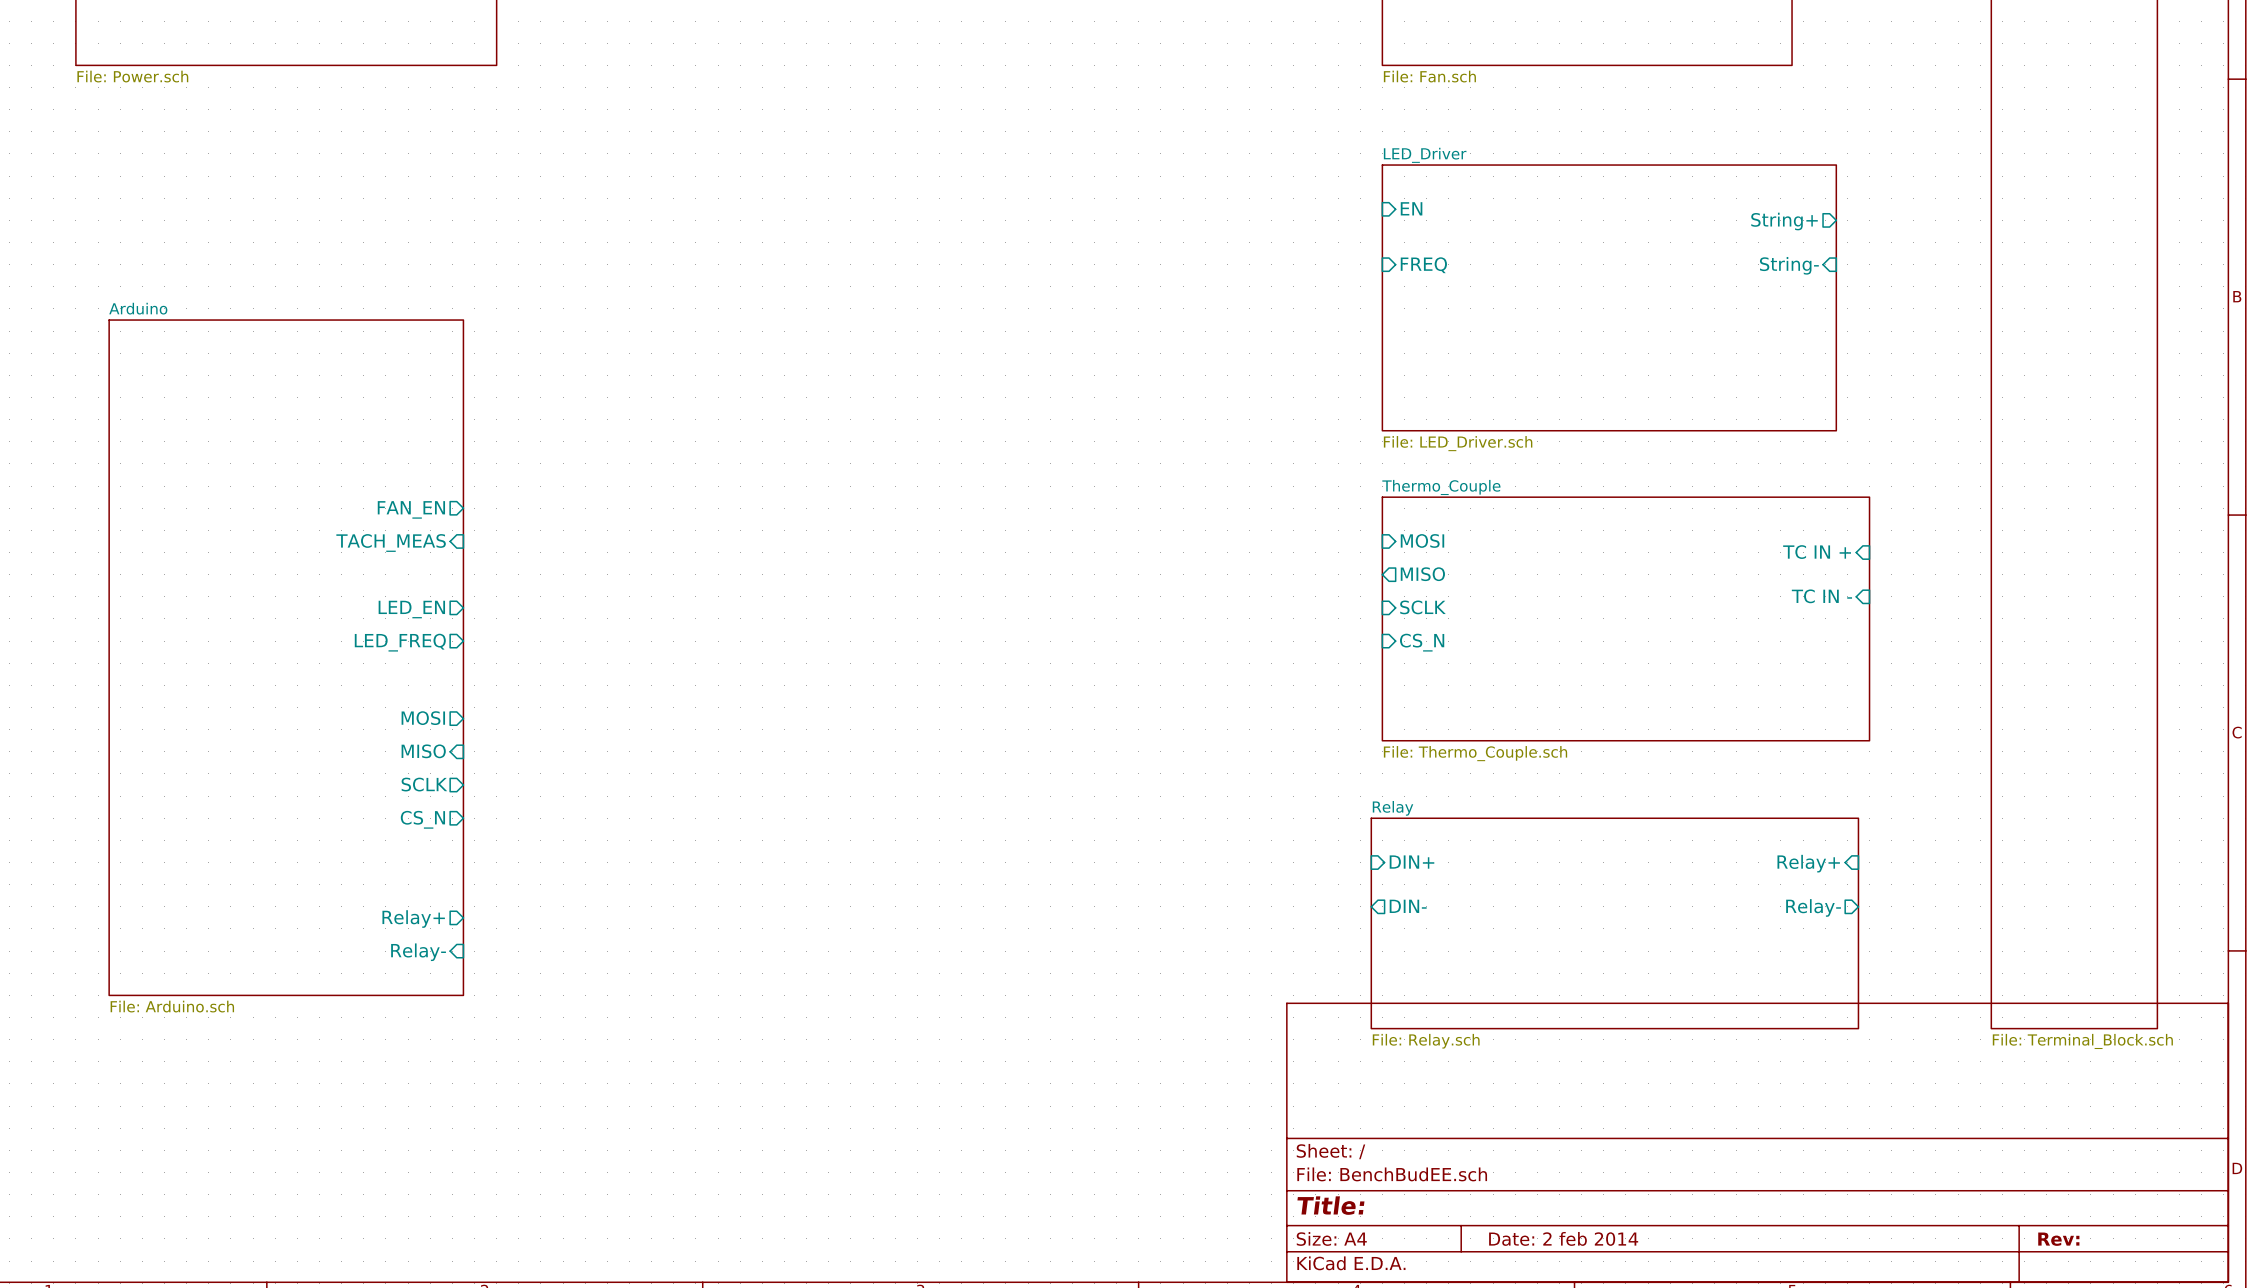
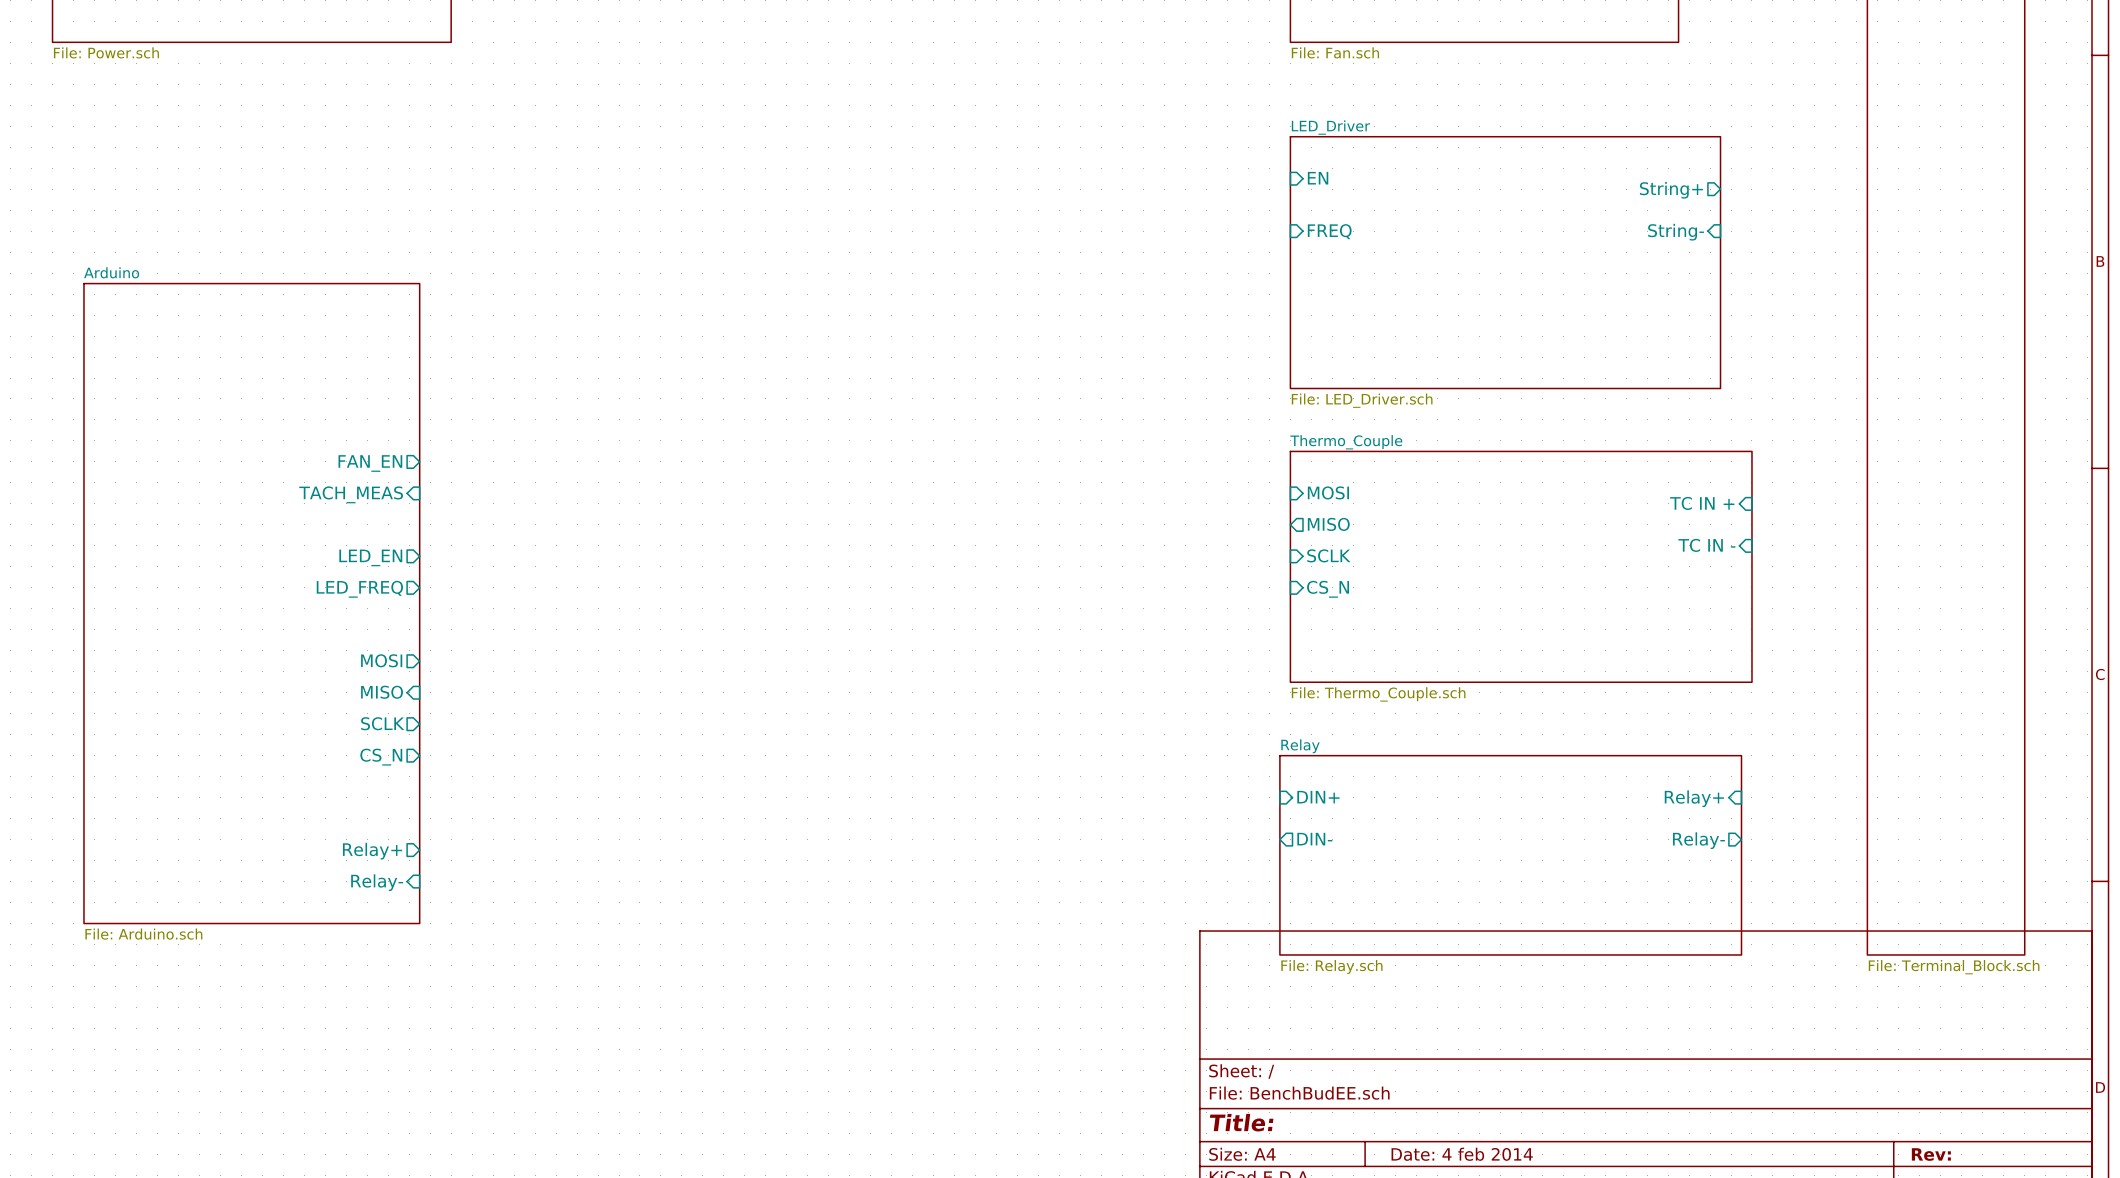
title block: Date: 2 feb 2014 (1563, 1238) -> Date: 4 feb 2014 (1462, 1154)

